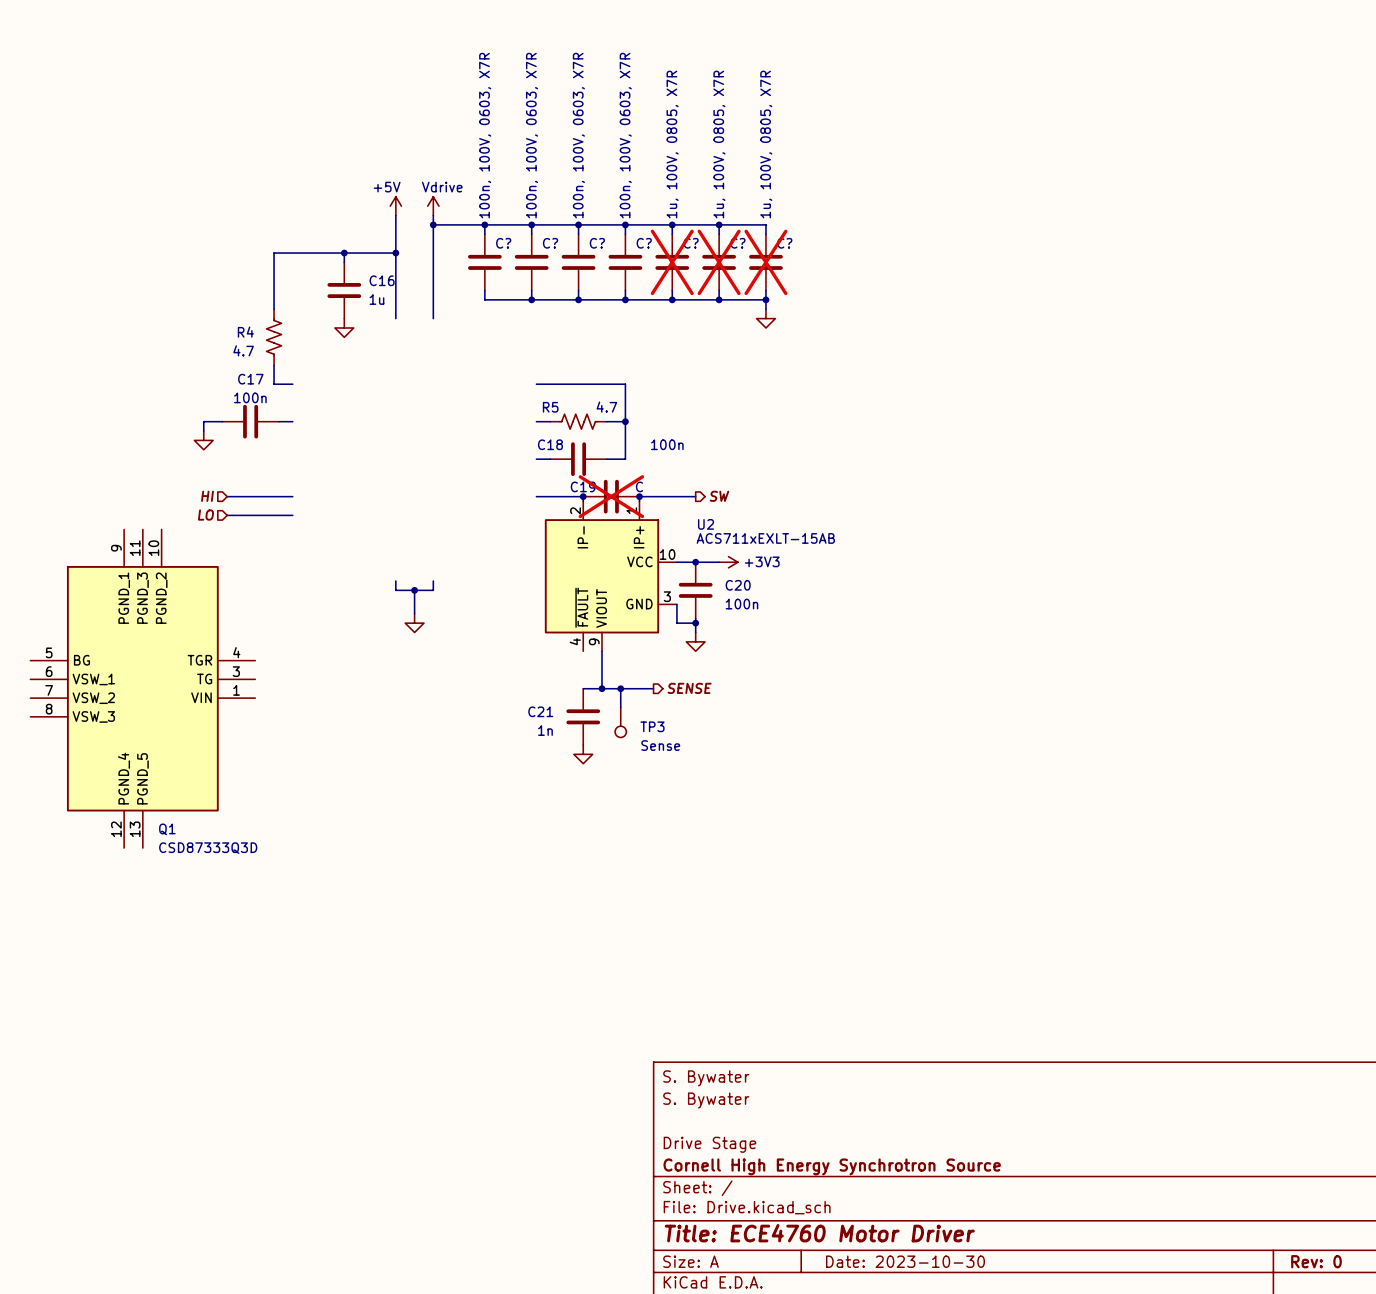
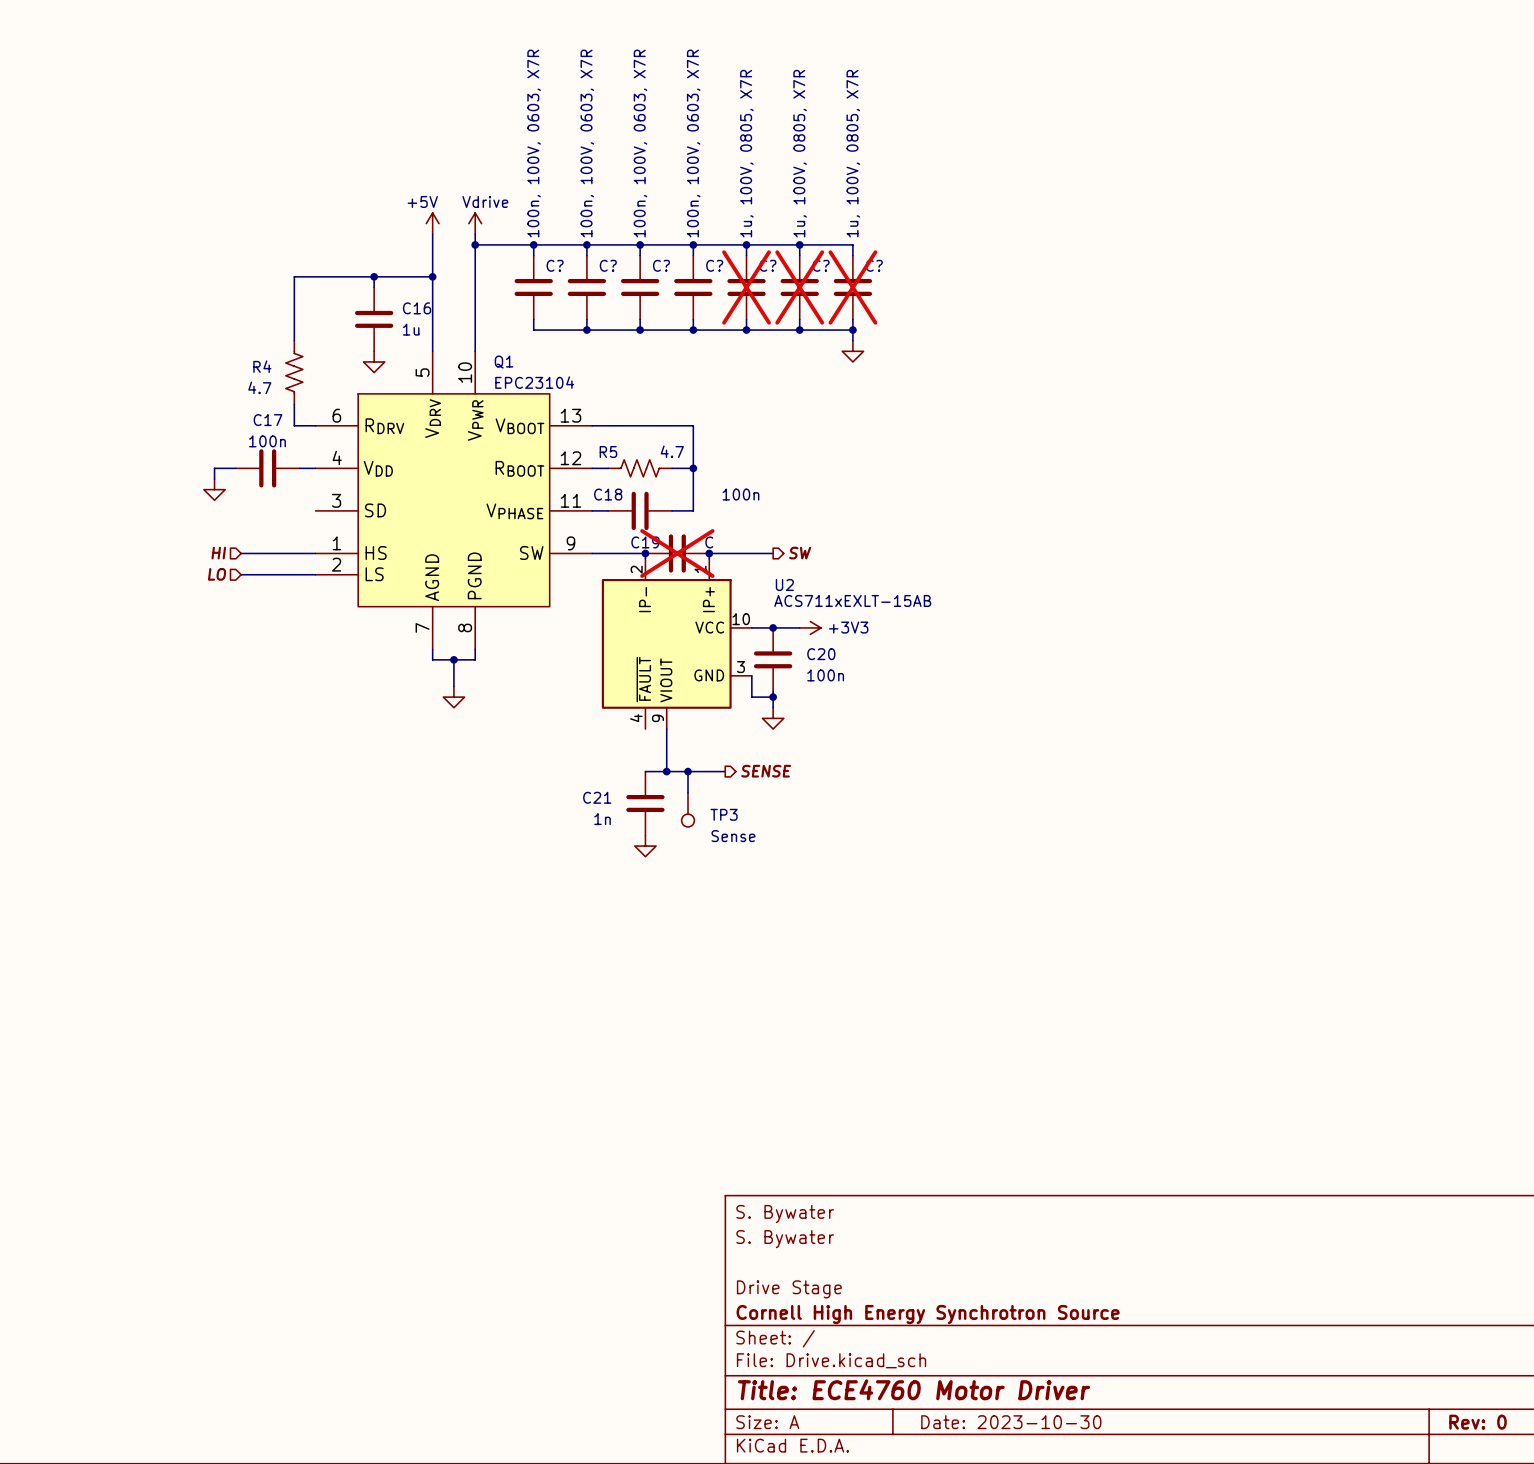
Q1 symbol: [30, 529, 256, 849] -> [315, 351, 593, 650]
Q1 name position: Q1 (167, 829) -> Q1 (504, 362)
Q1 value: CSD87333Q3D (208, 848) -> EPC23104 (534, 382)

